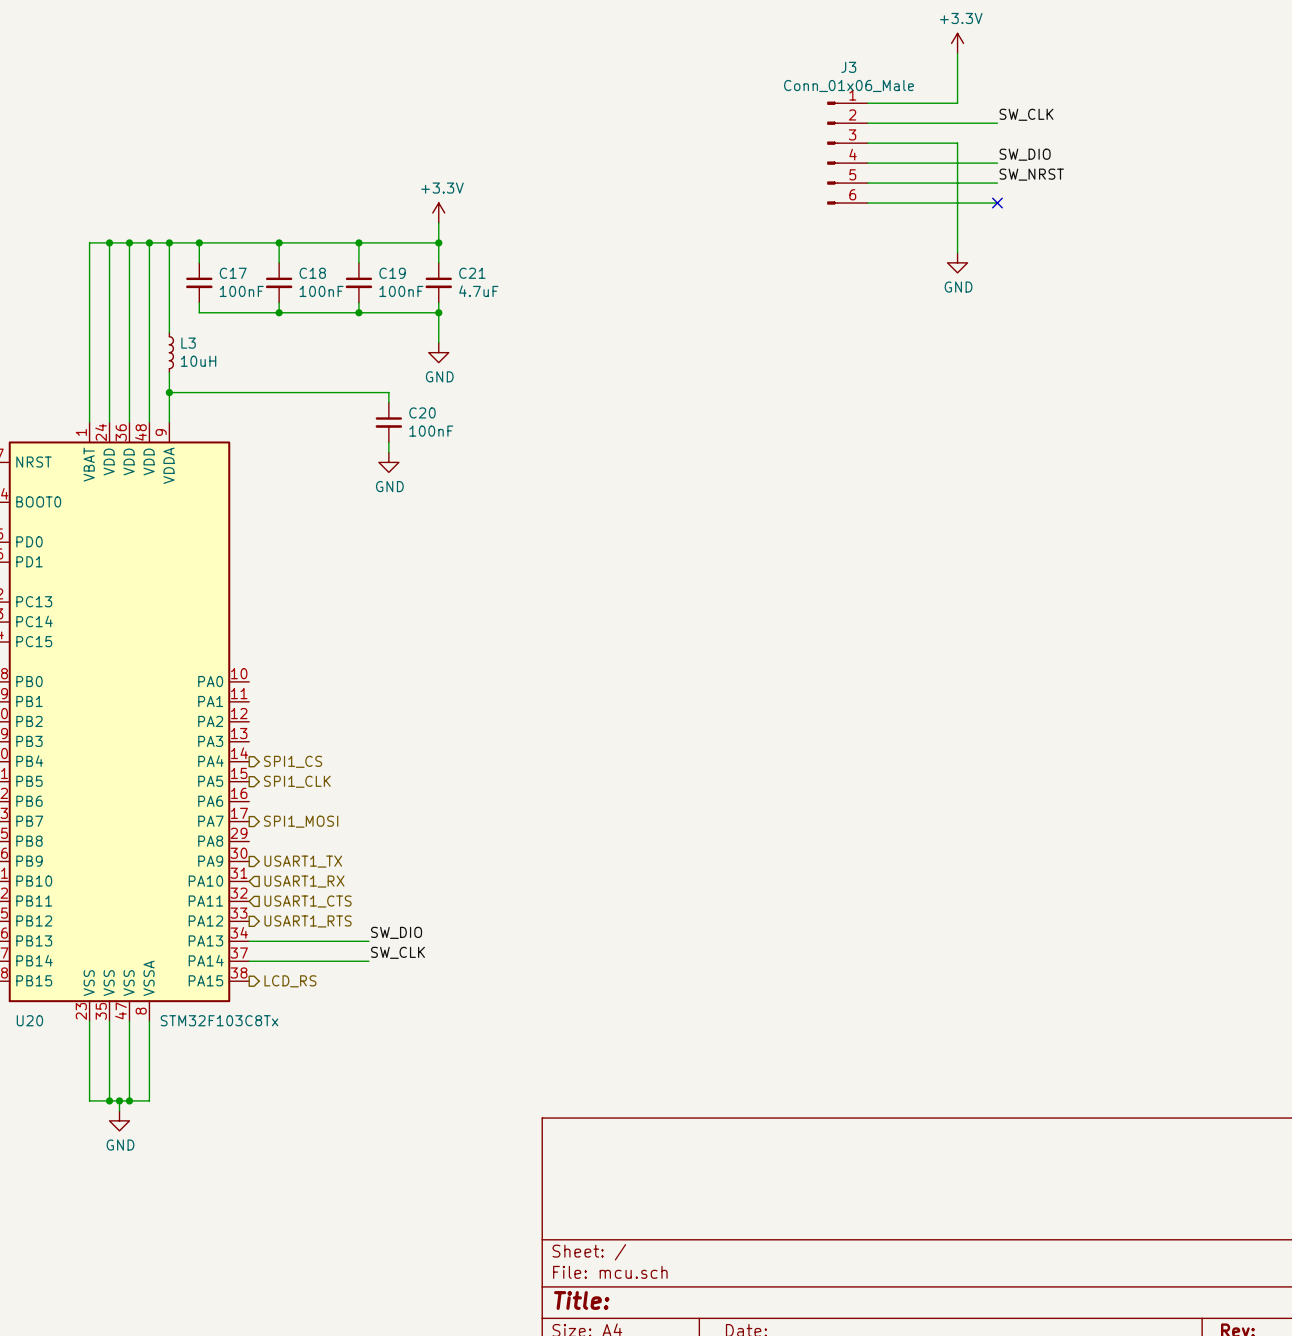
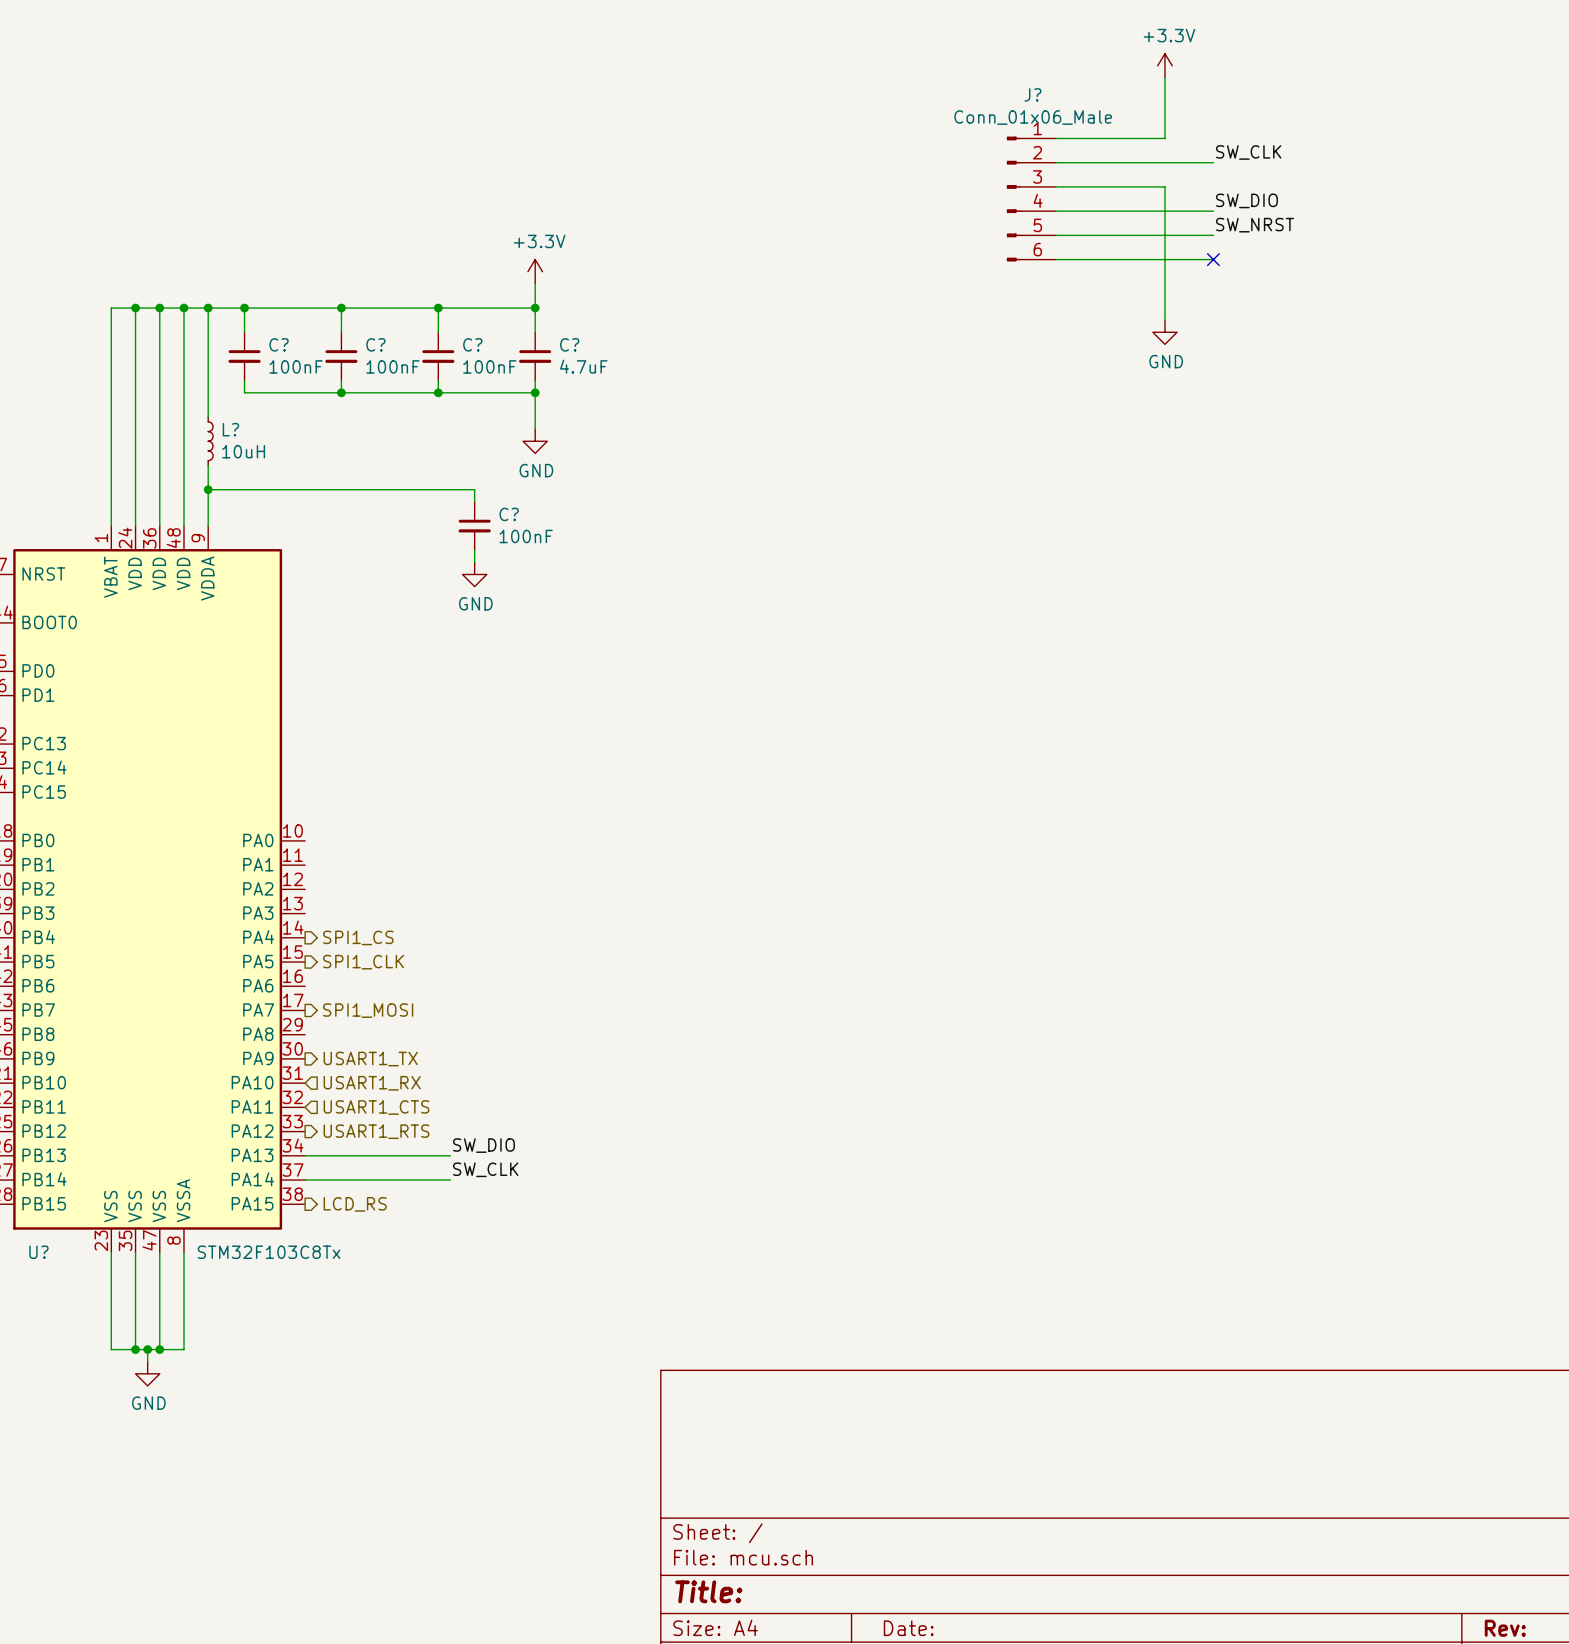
J3 name: J3 (848, 67) -> J? (1032, 94)
C17 name: C17 (233, 273) -> C? (279, 344)
C18 name: C18 (312, 273) -> C? (375, 344)
C19 name: C19 (392, 273) -> C? (472, 344)
C21 name: C21 (472, 273) -> C? (569, 344)
L3 name: L3 (188, 343) -> L? (230, 429)
C20 name: C20 (422, 412) -> C? (509, 514)
U20 name: U20 (29, 1020) -> U? (38, 1252)

